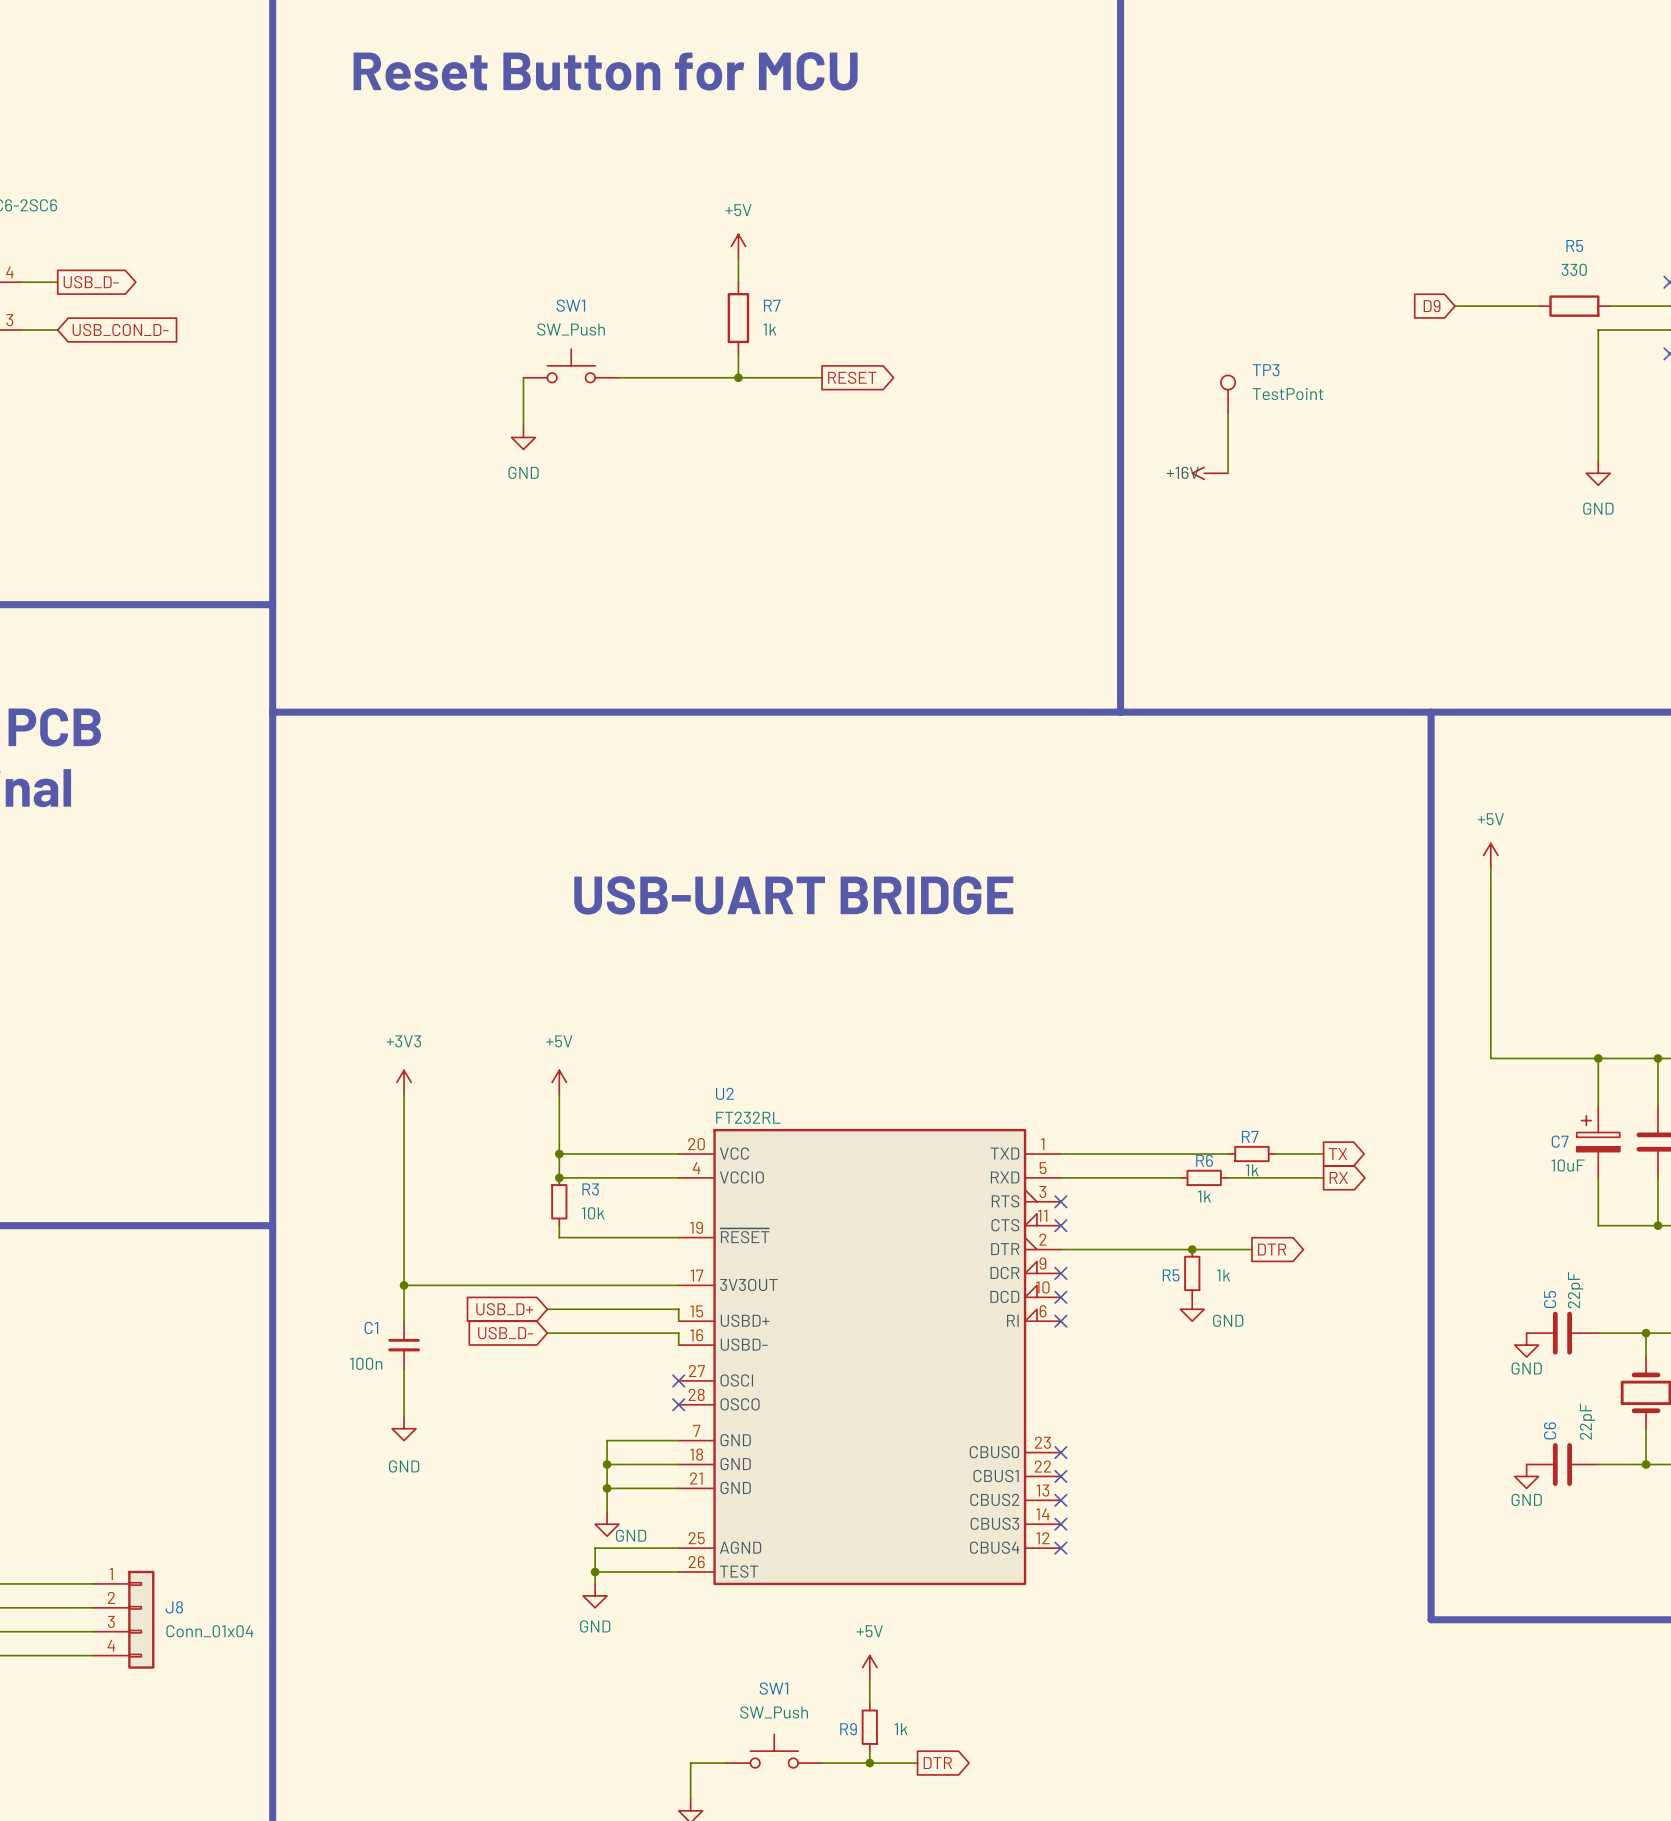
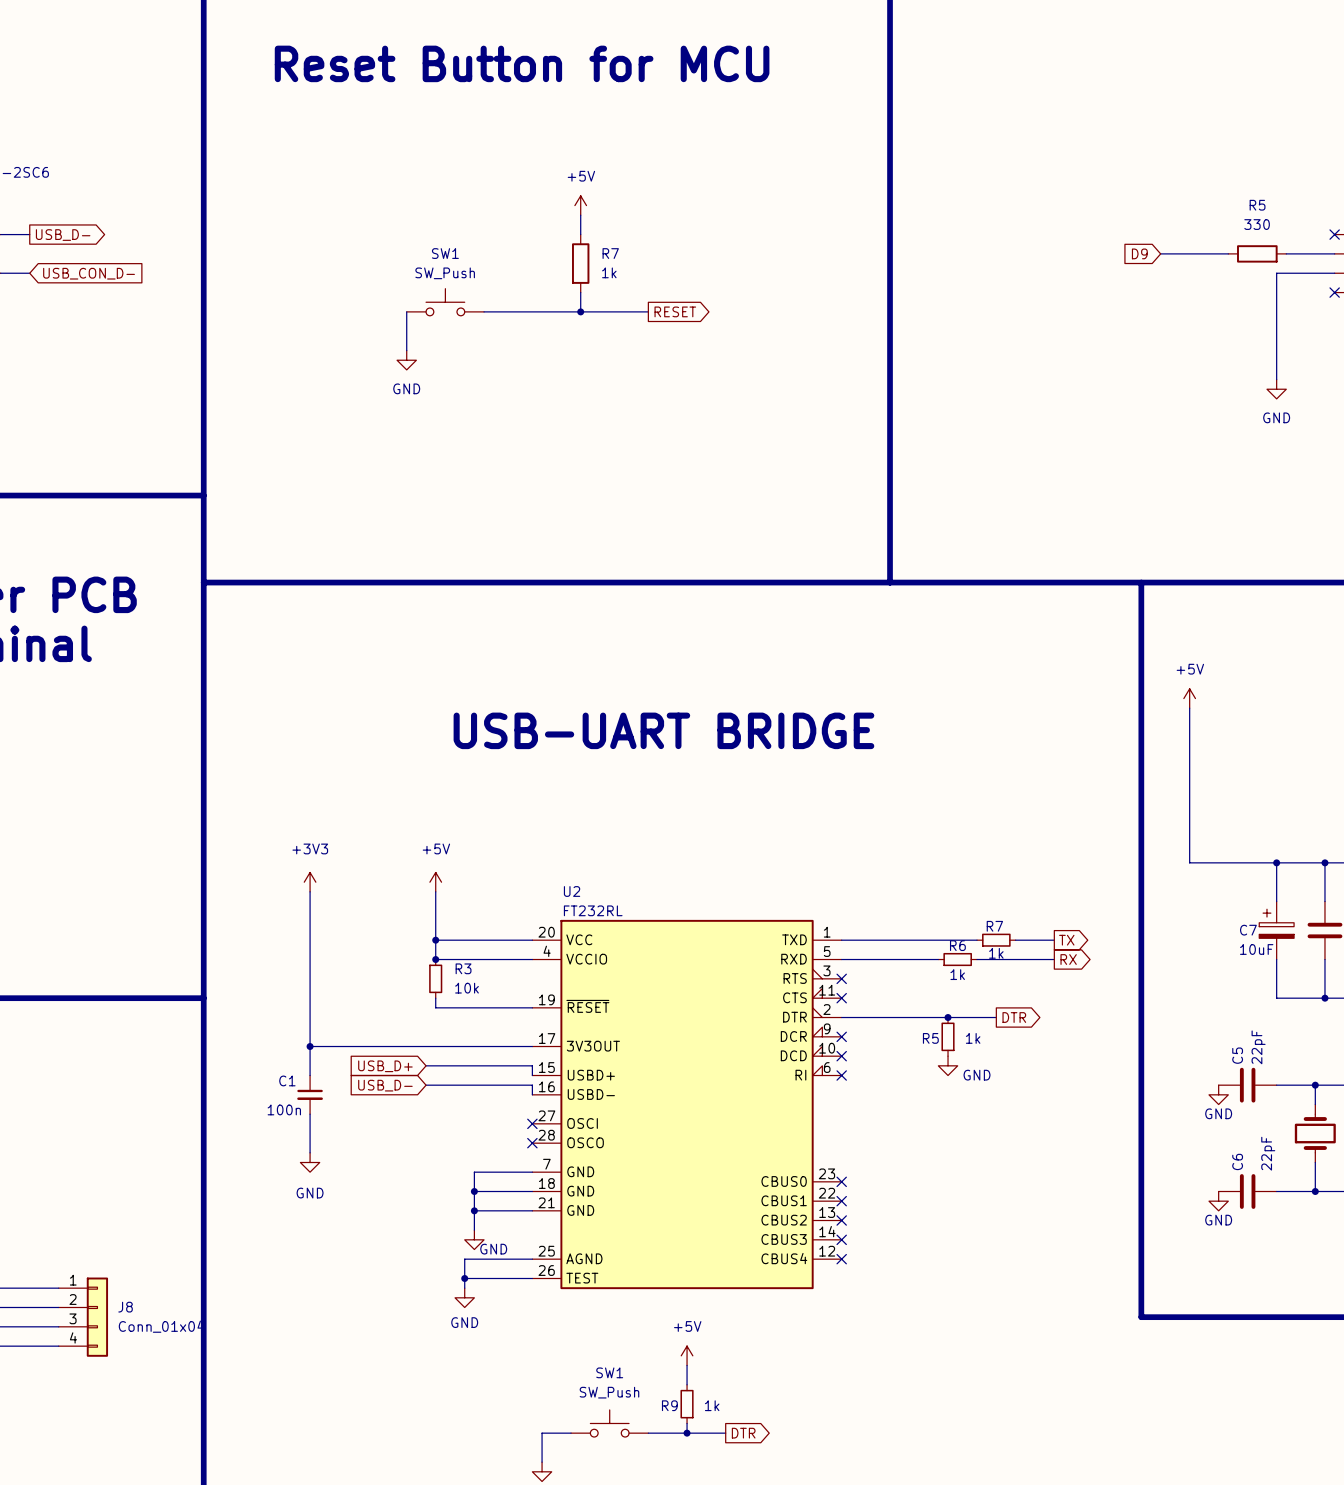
TP3: TestPoint (1228, 394) -> none
wire: (1228, 413) (1228, 473) -> none
power symbol: (1210, 473) -> none

